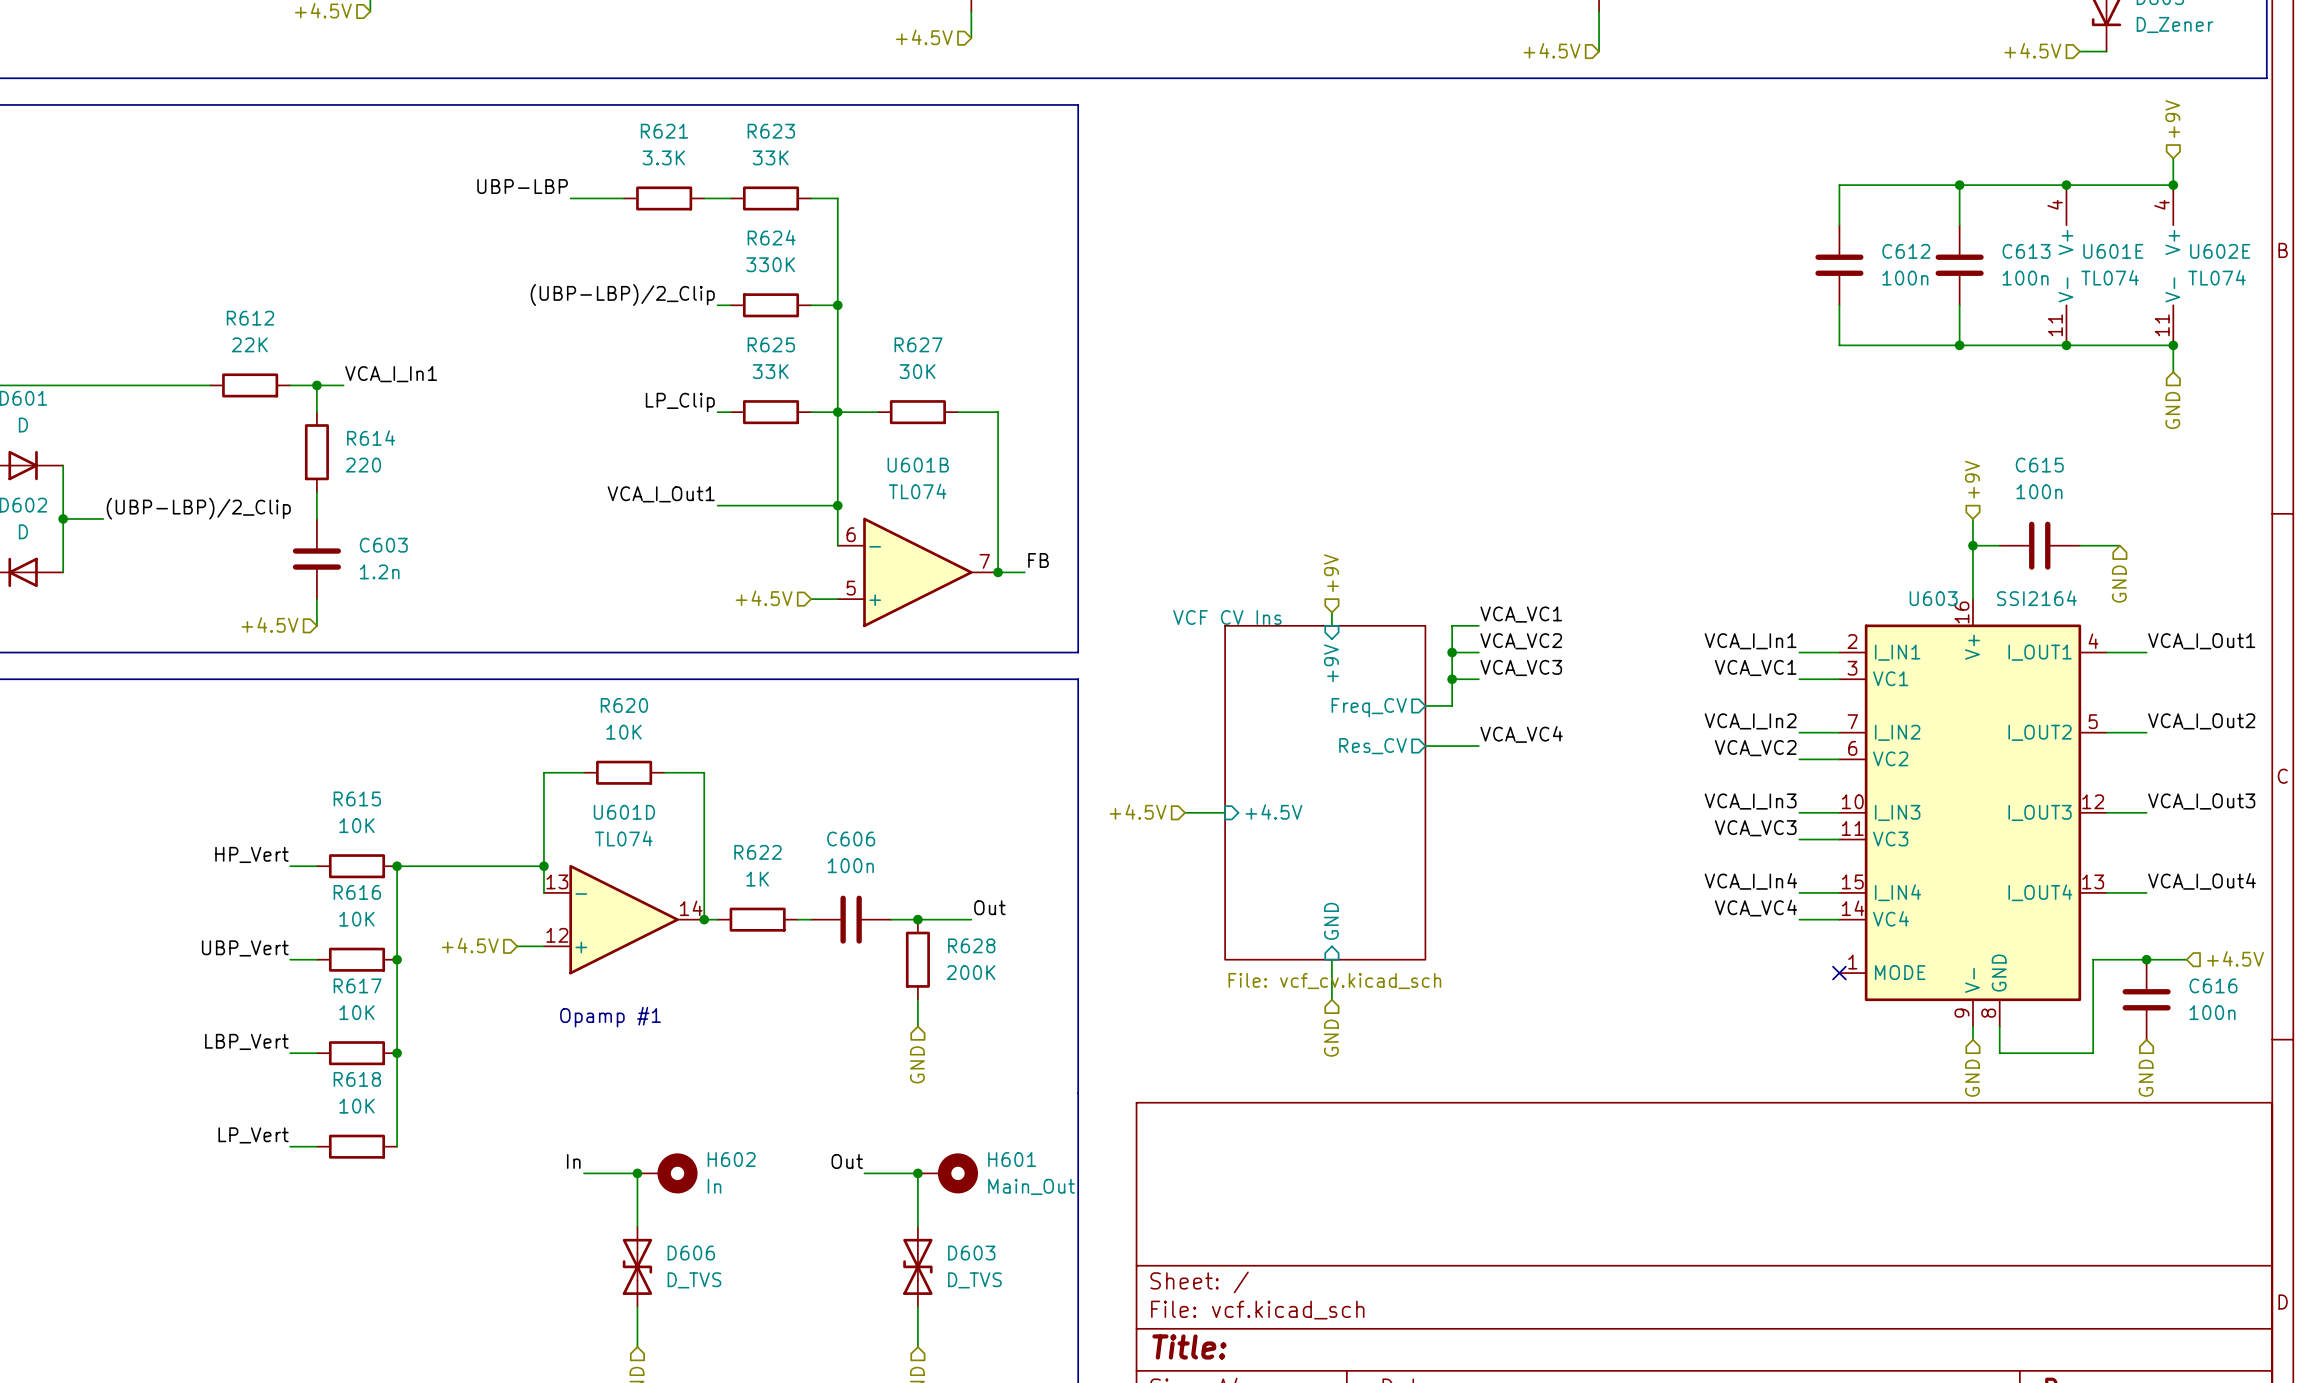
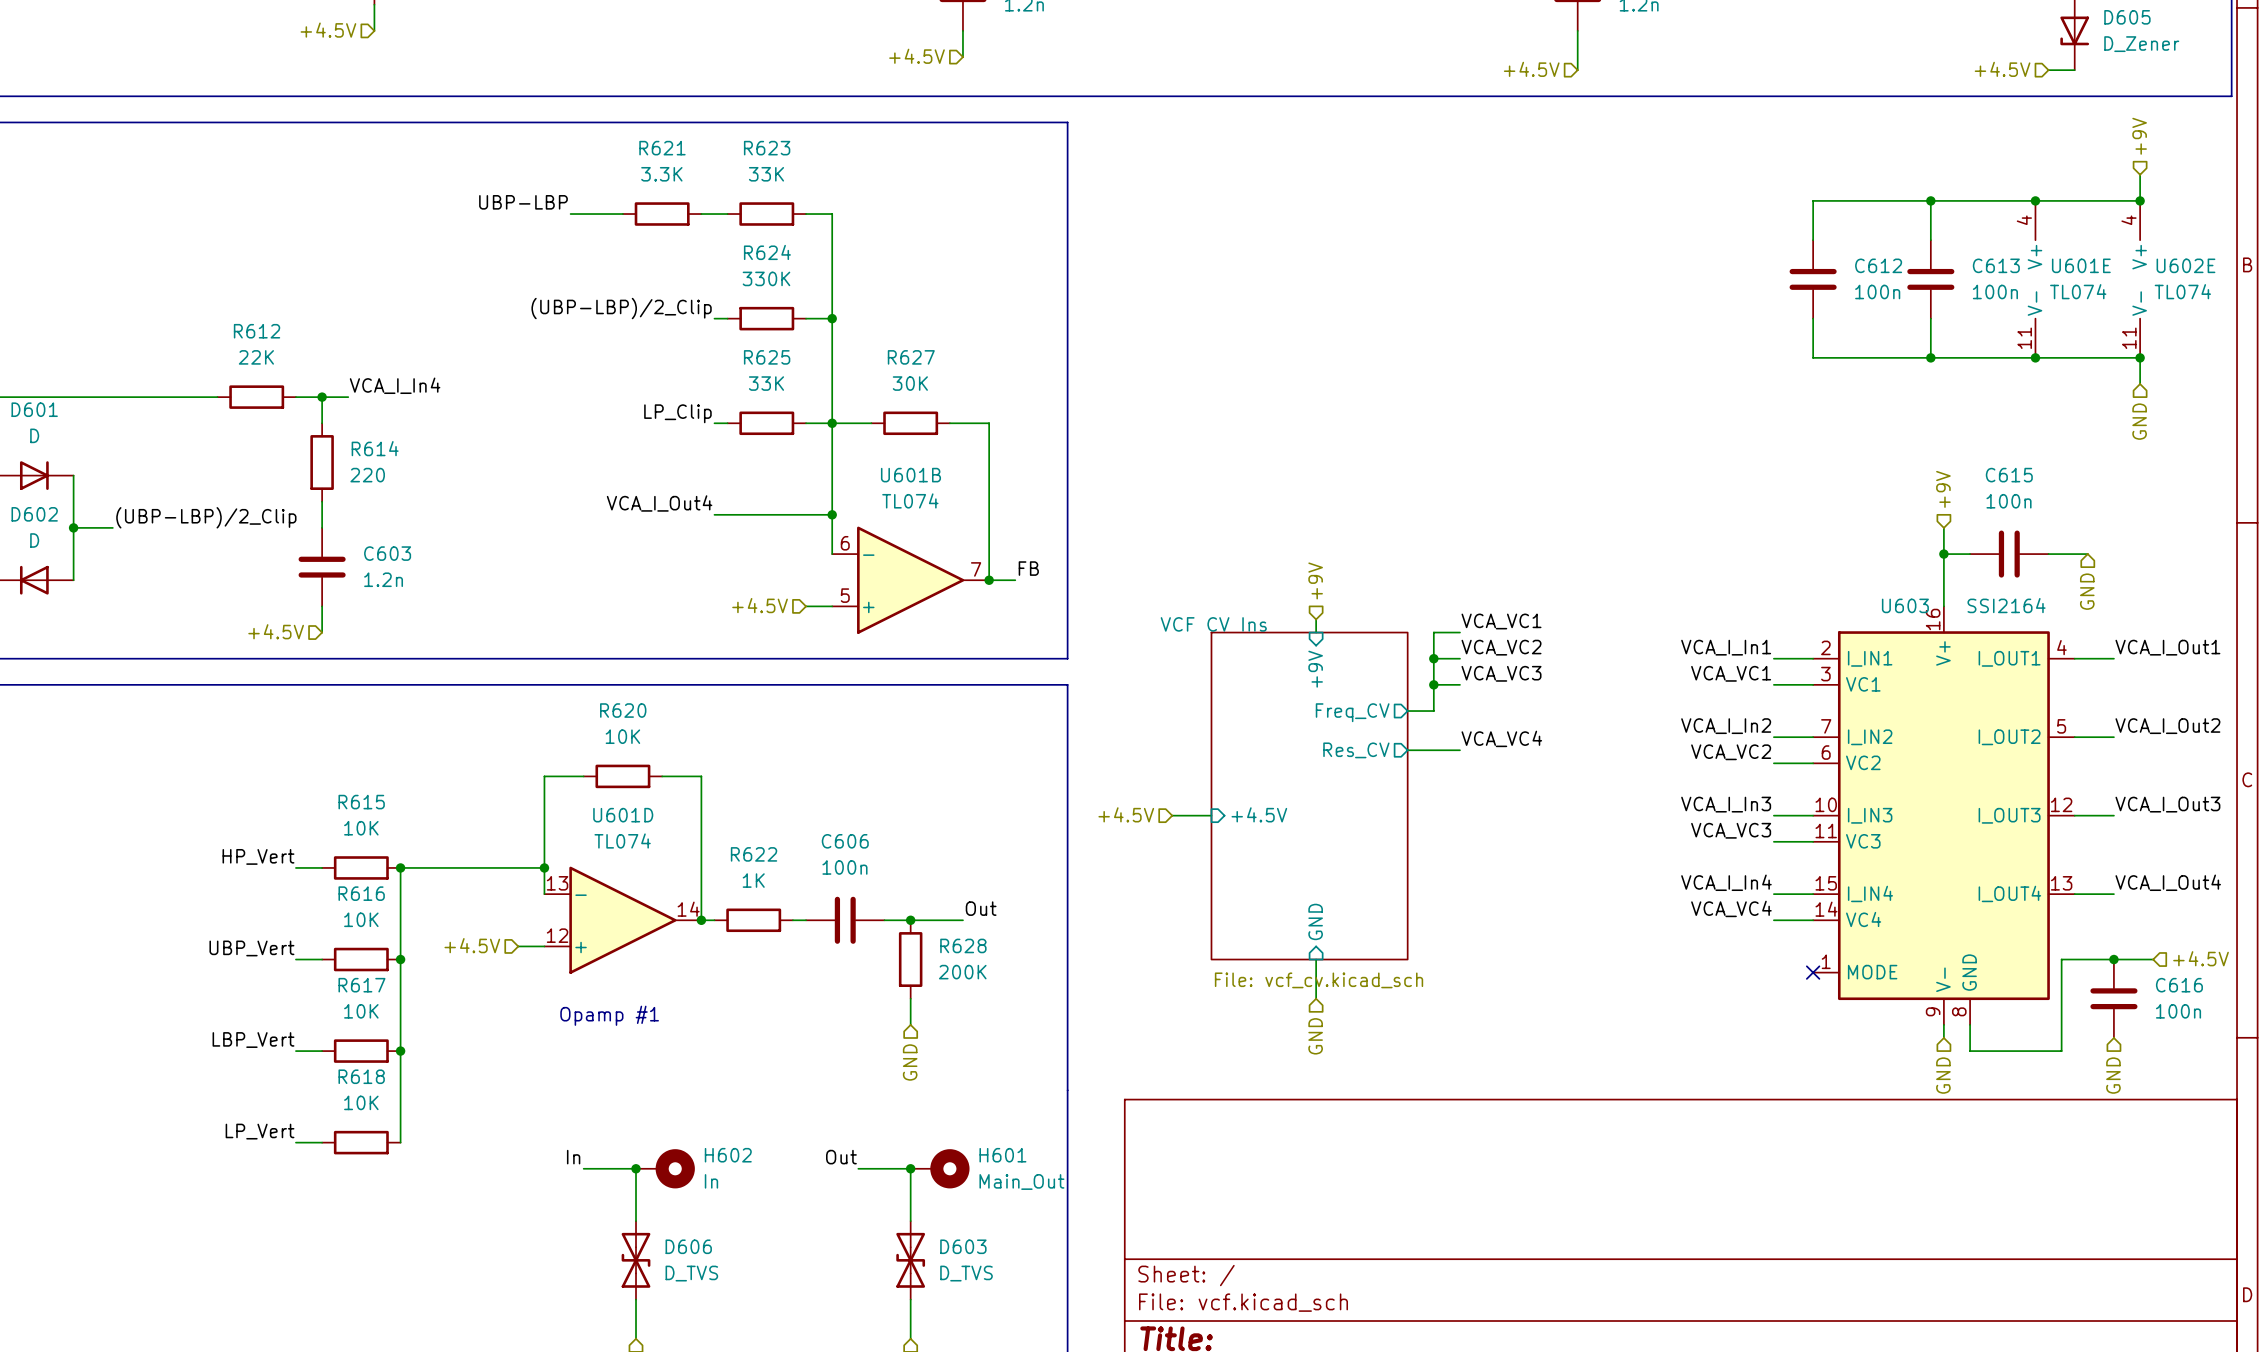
label: VCA_I_In1 (391, 374) -> VCA_I_In4 (395, 385)
label: VCA_I_Out1 (661, 494) -> VCA_I_Out4 (659, 503)

